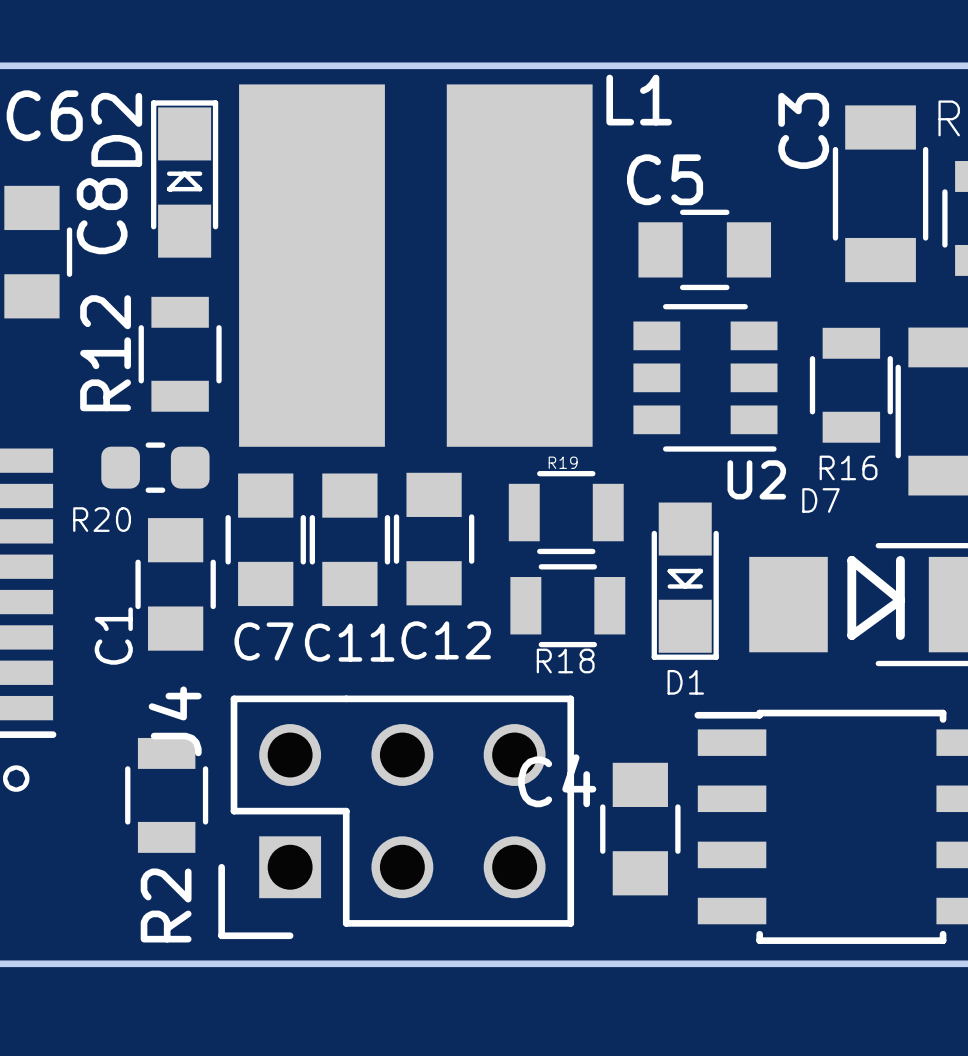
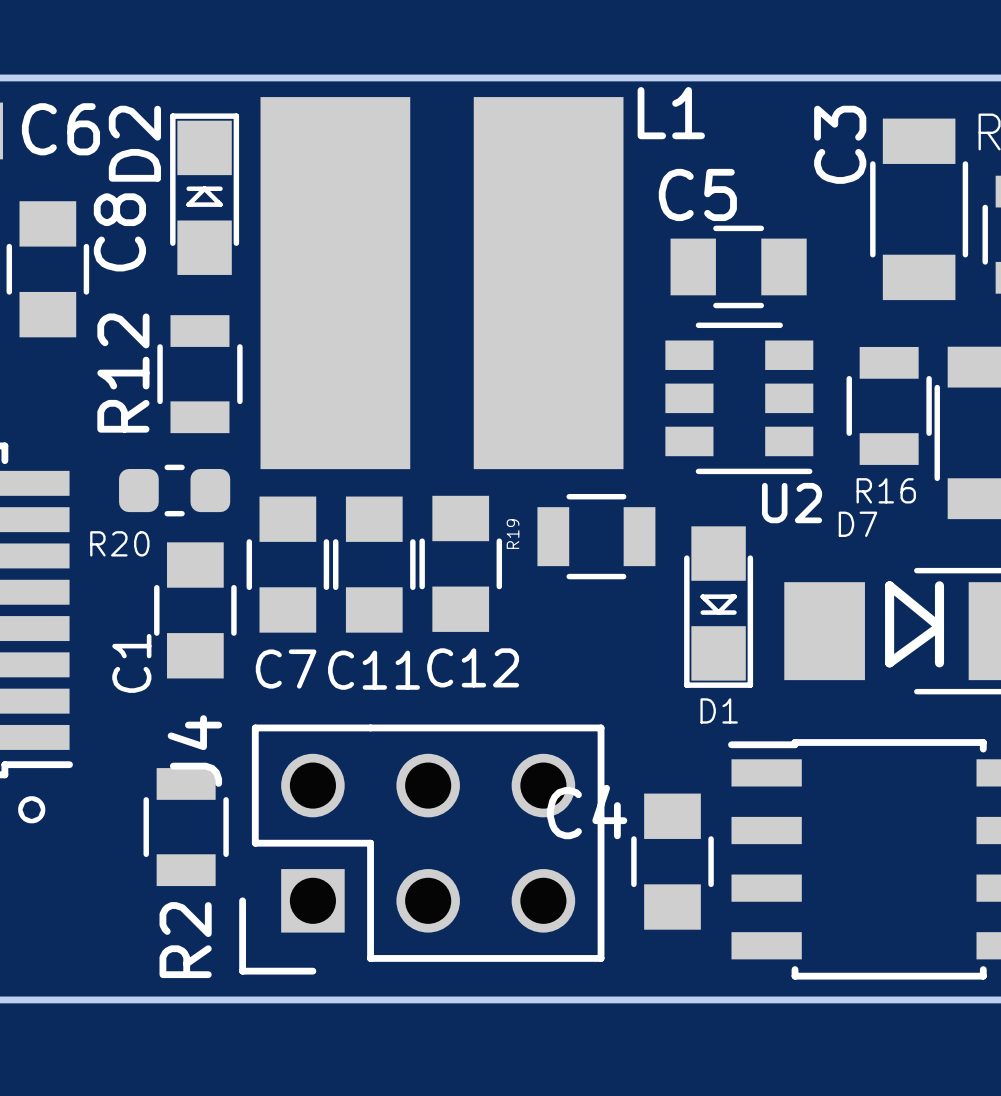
R19 name rotation: 0° (563, 462) -> 90° counterclockwise (513, 534)
R19 name position: R19 (563, 462) -> R19 (513, 534)
R18: (567, 605) -> none

